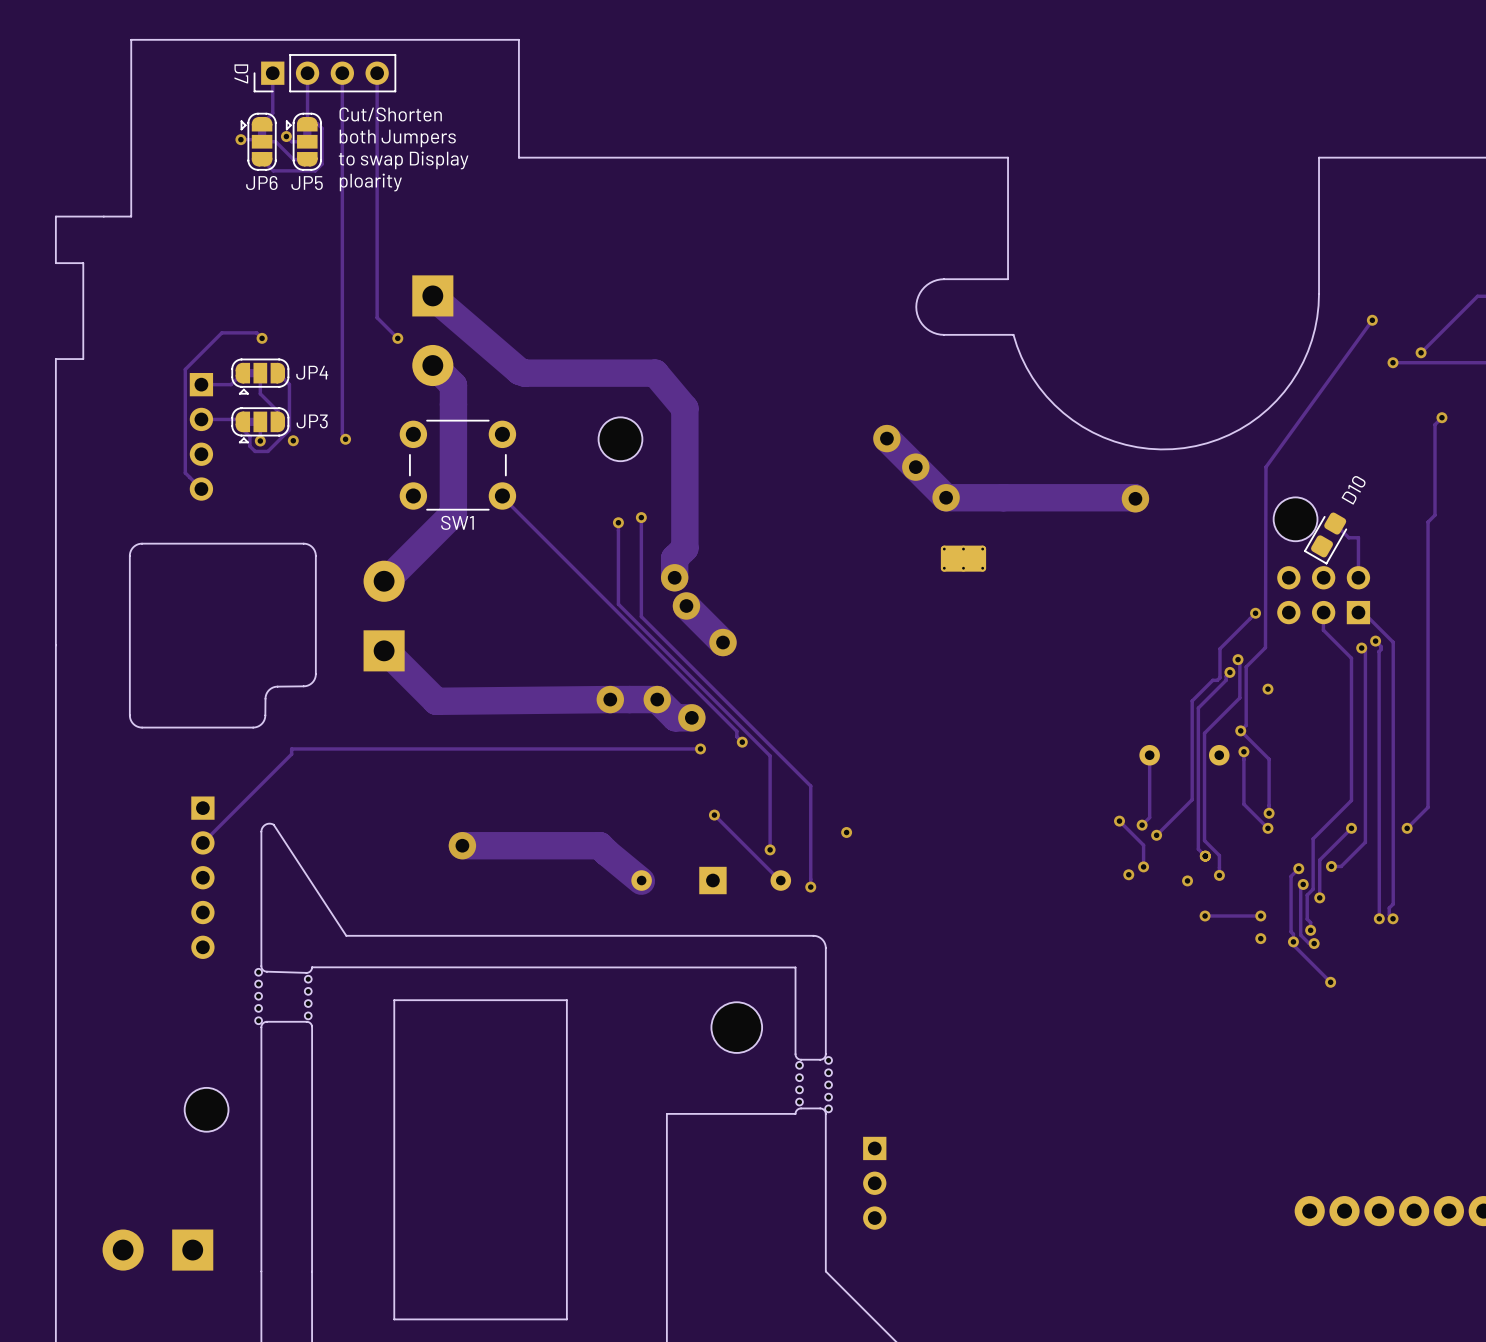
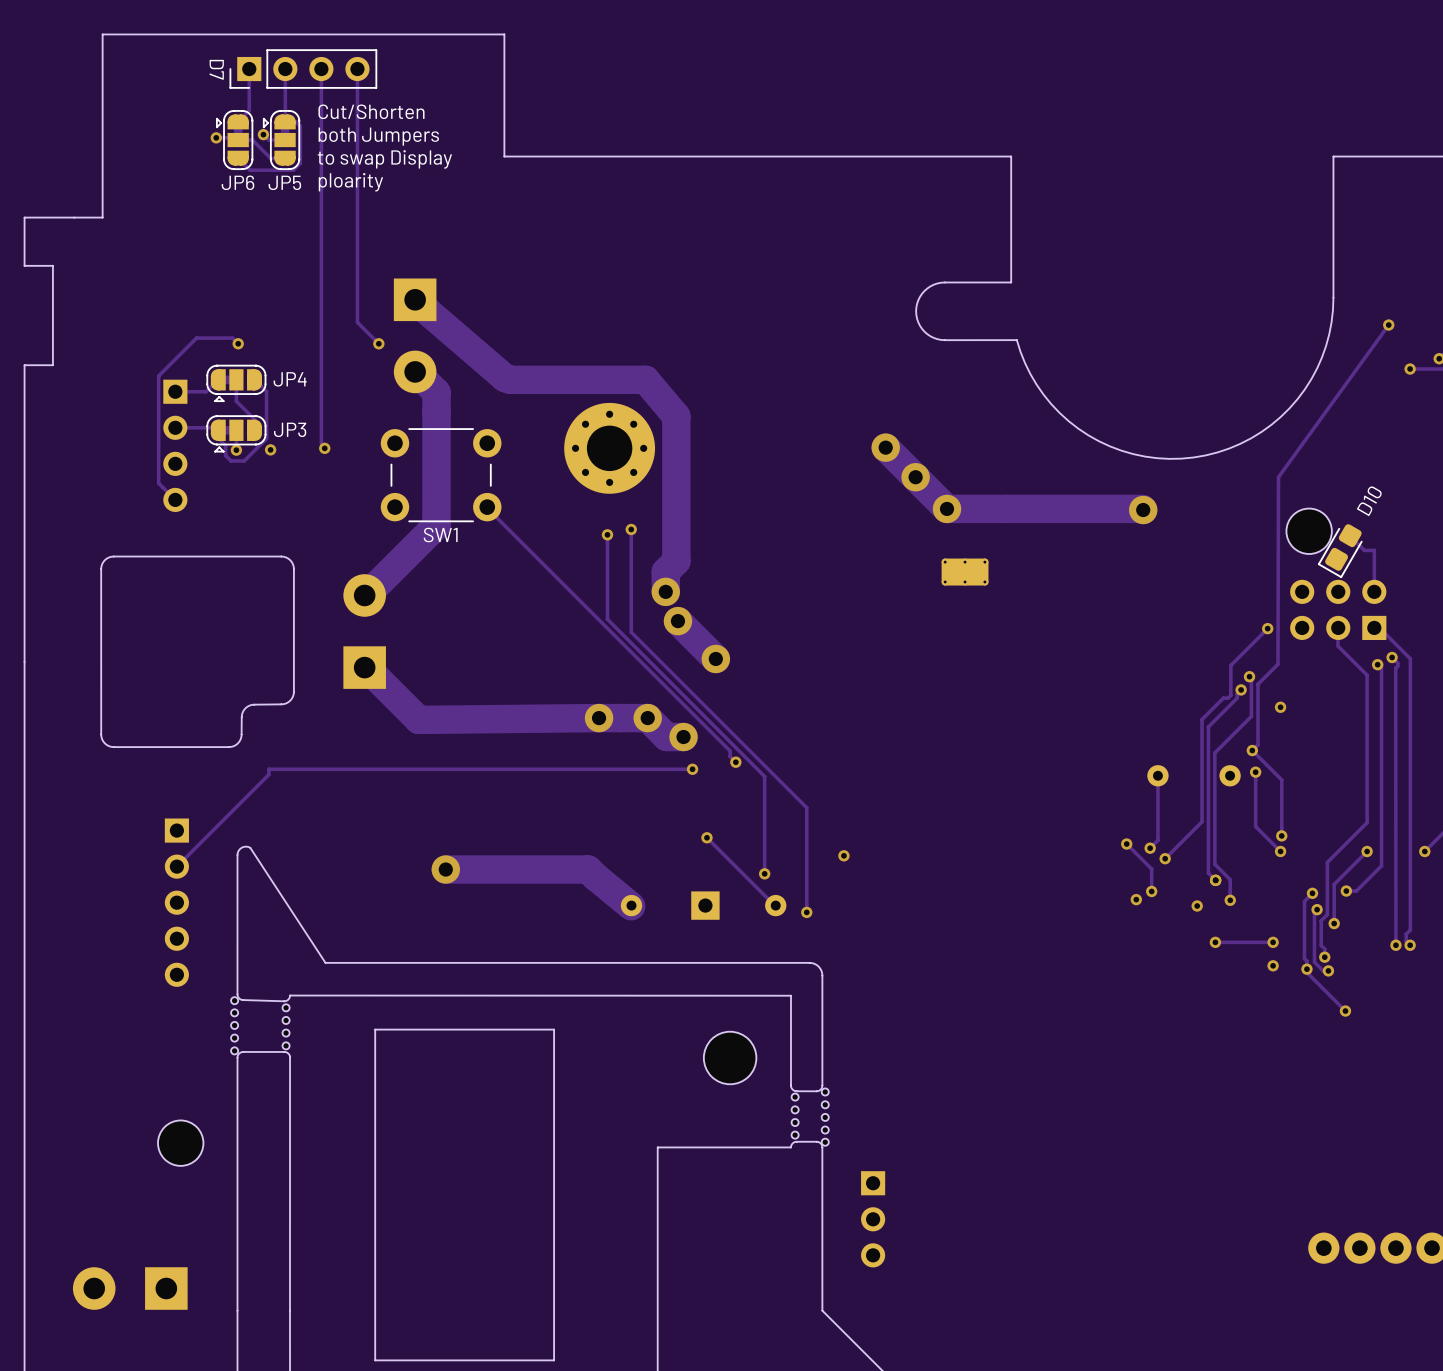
part footprint: [598, 417, 643, 462] -> [564, 402, 656, 494]

